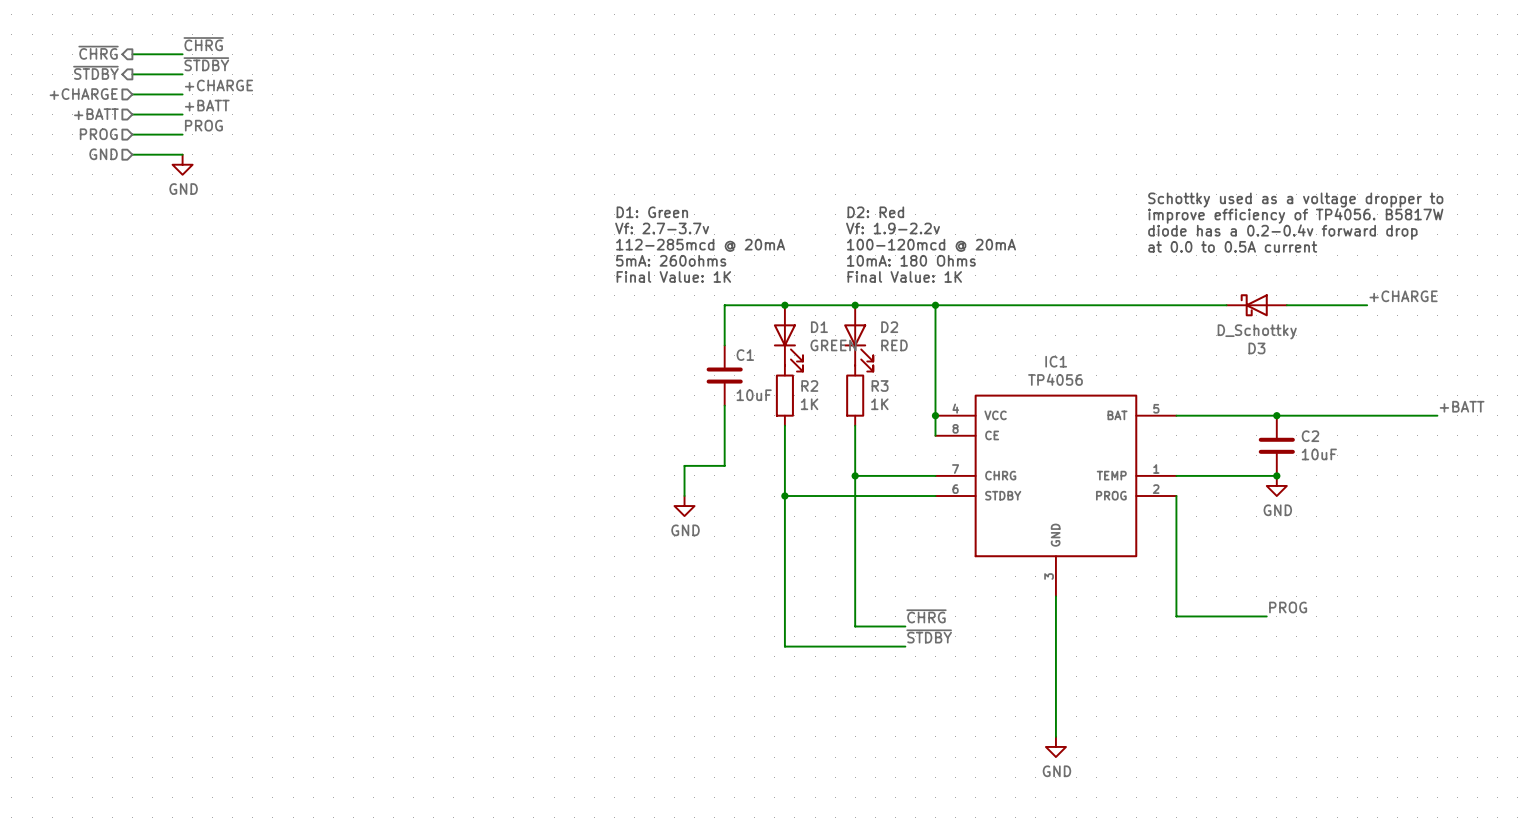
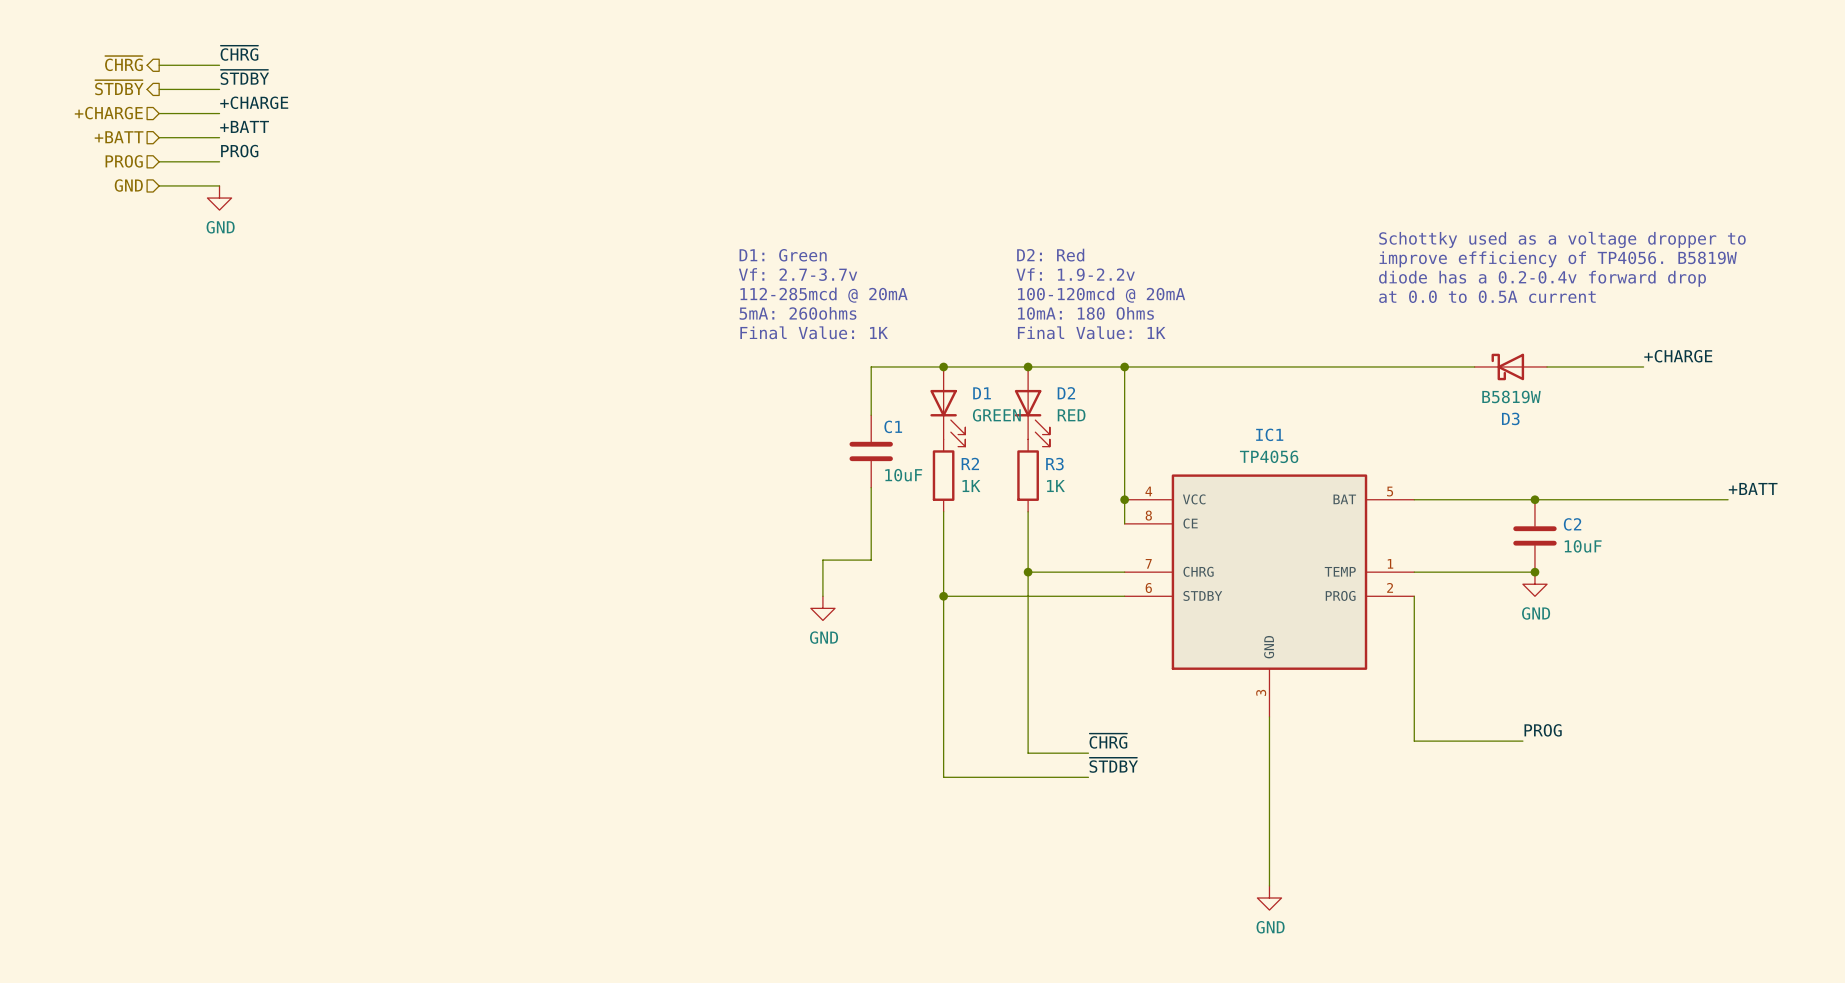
text: improve efficiency of TP4056. B5817W (1295, 215) -> improve efficiency of TP4056. B5819W (1558, 259)
D3 value: D_Schottky (1257, 331) -> B5819W (1511, 396)

